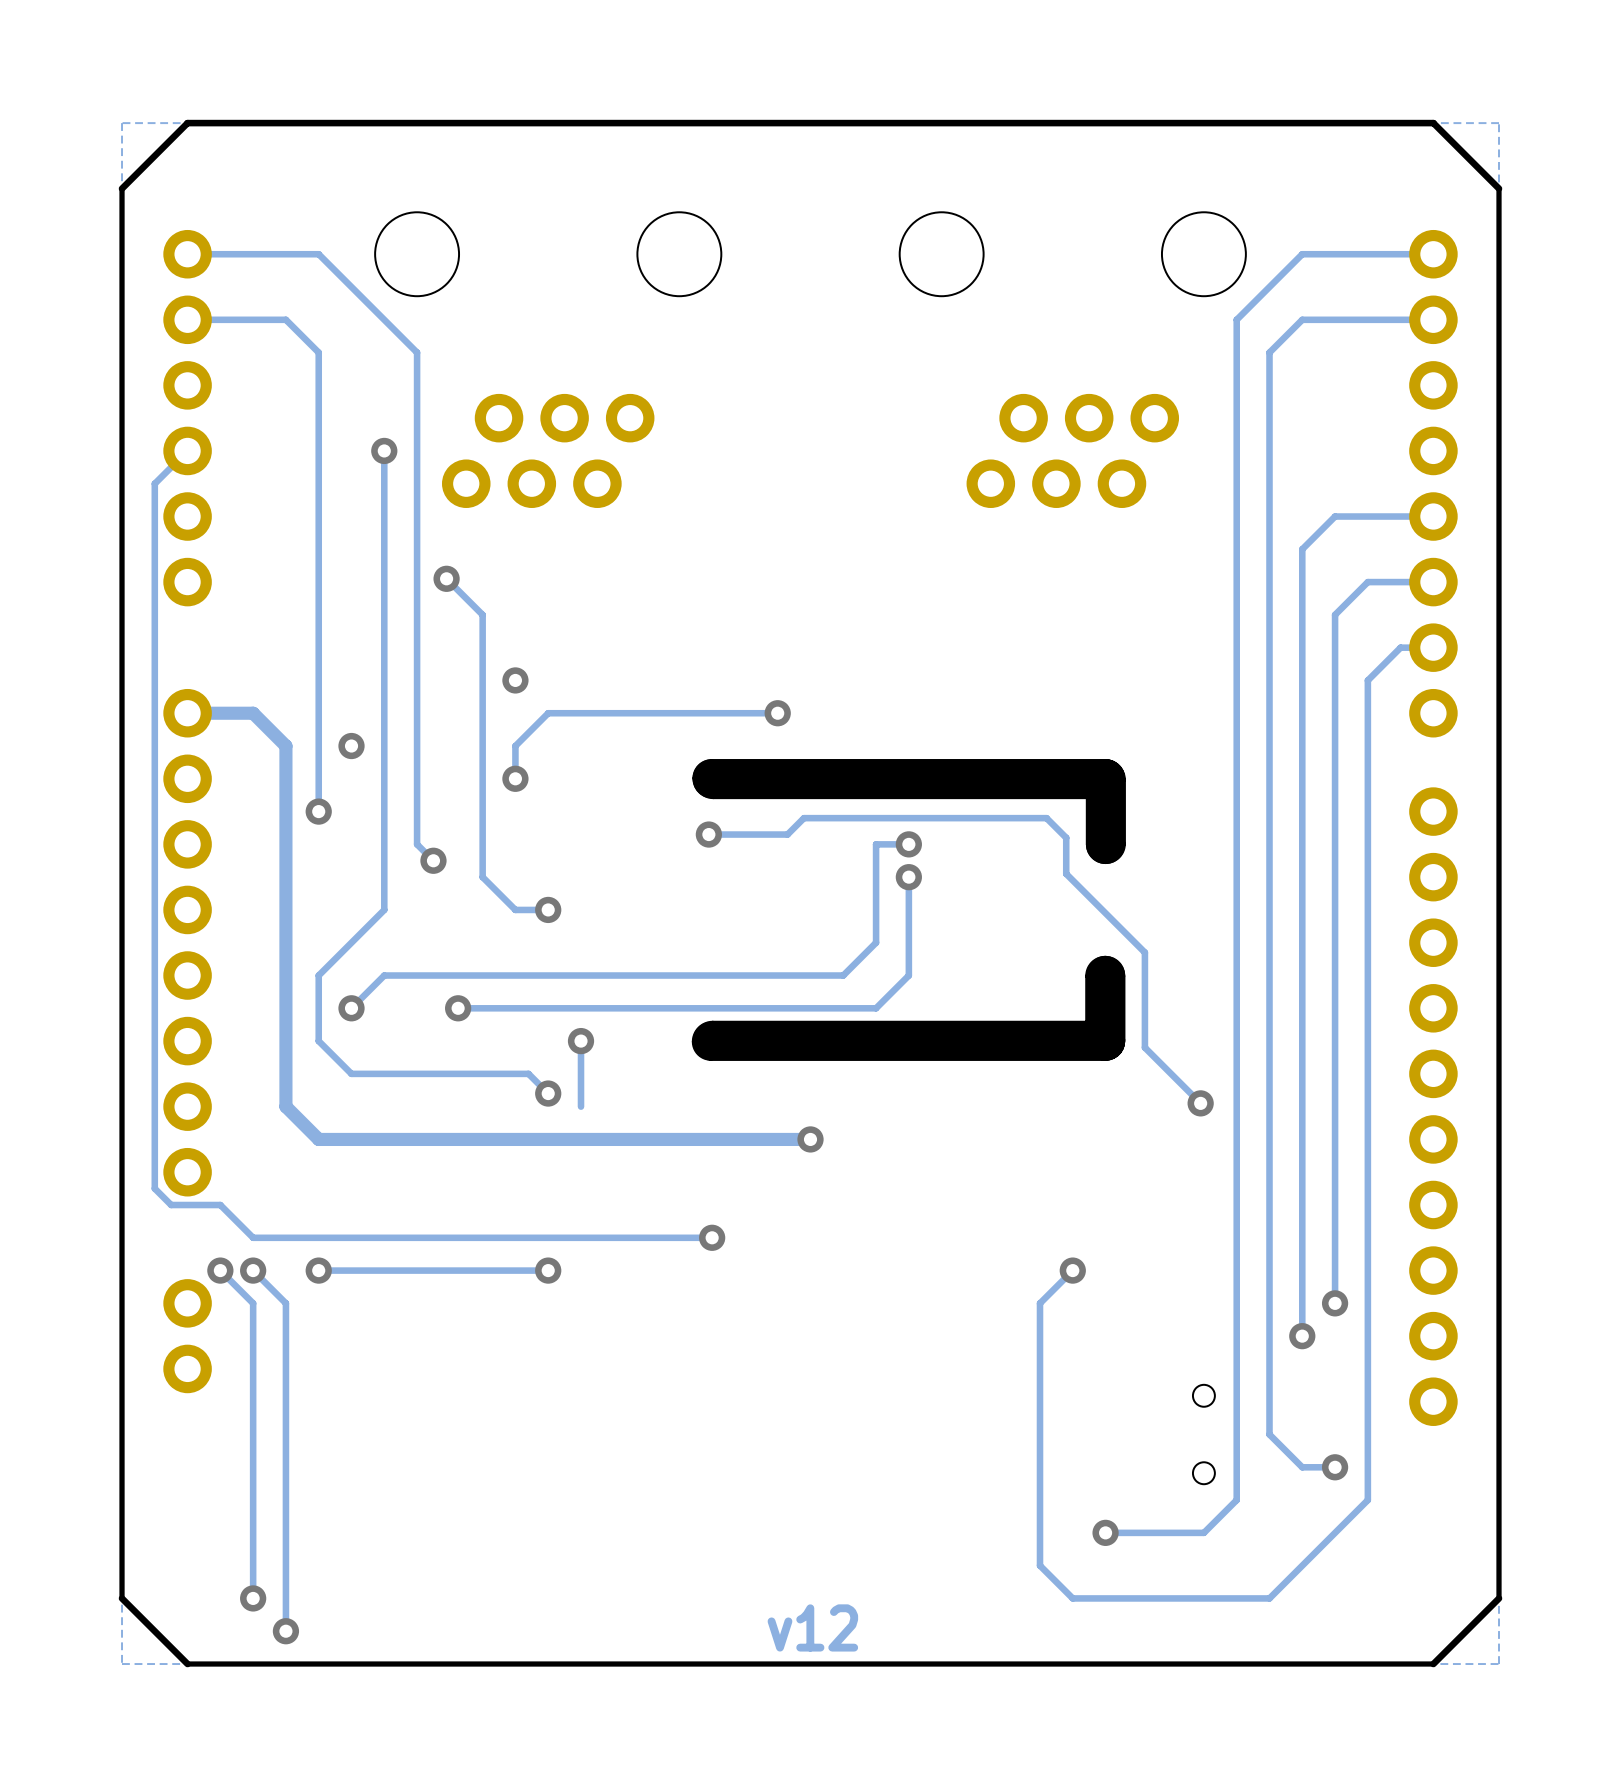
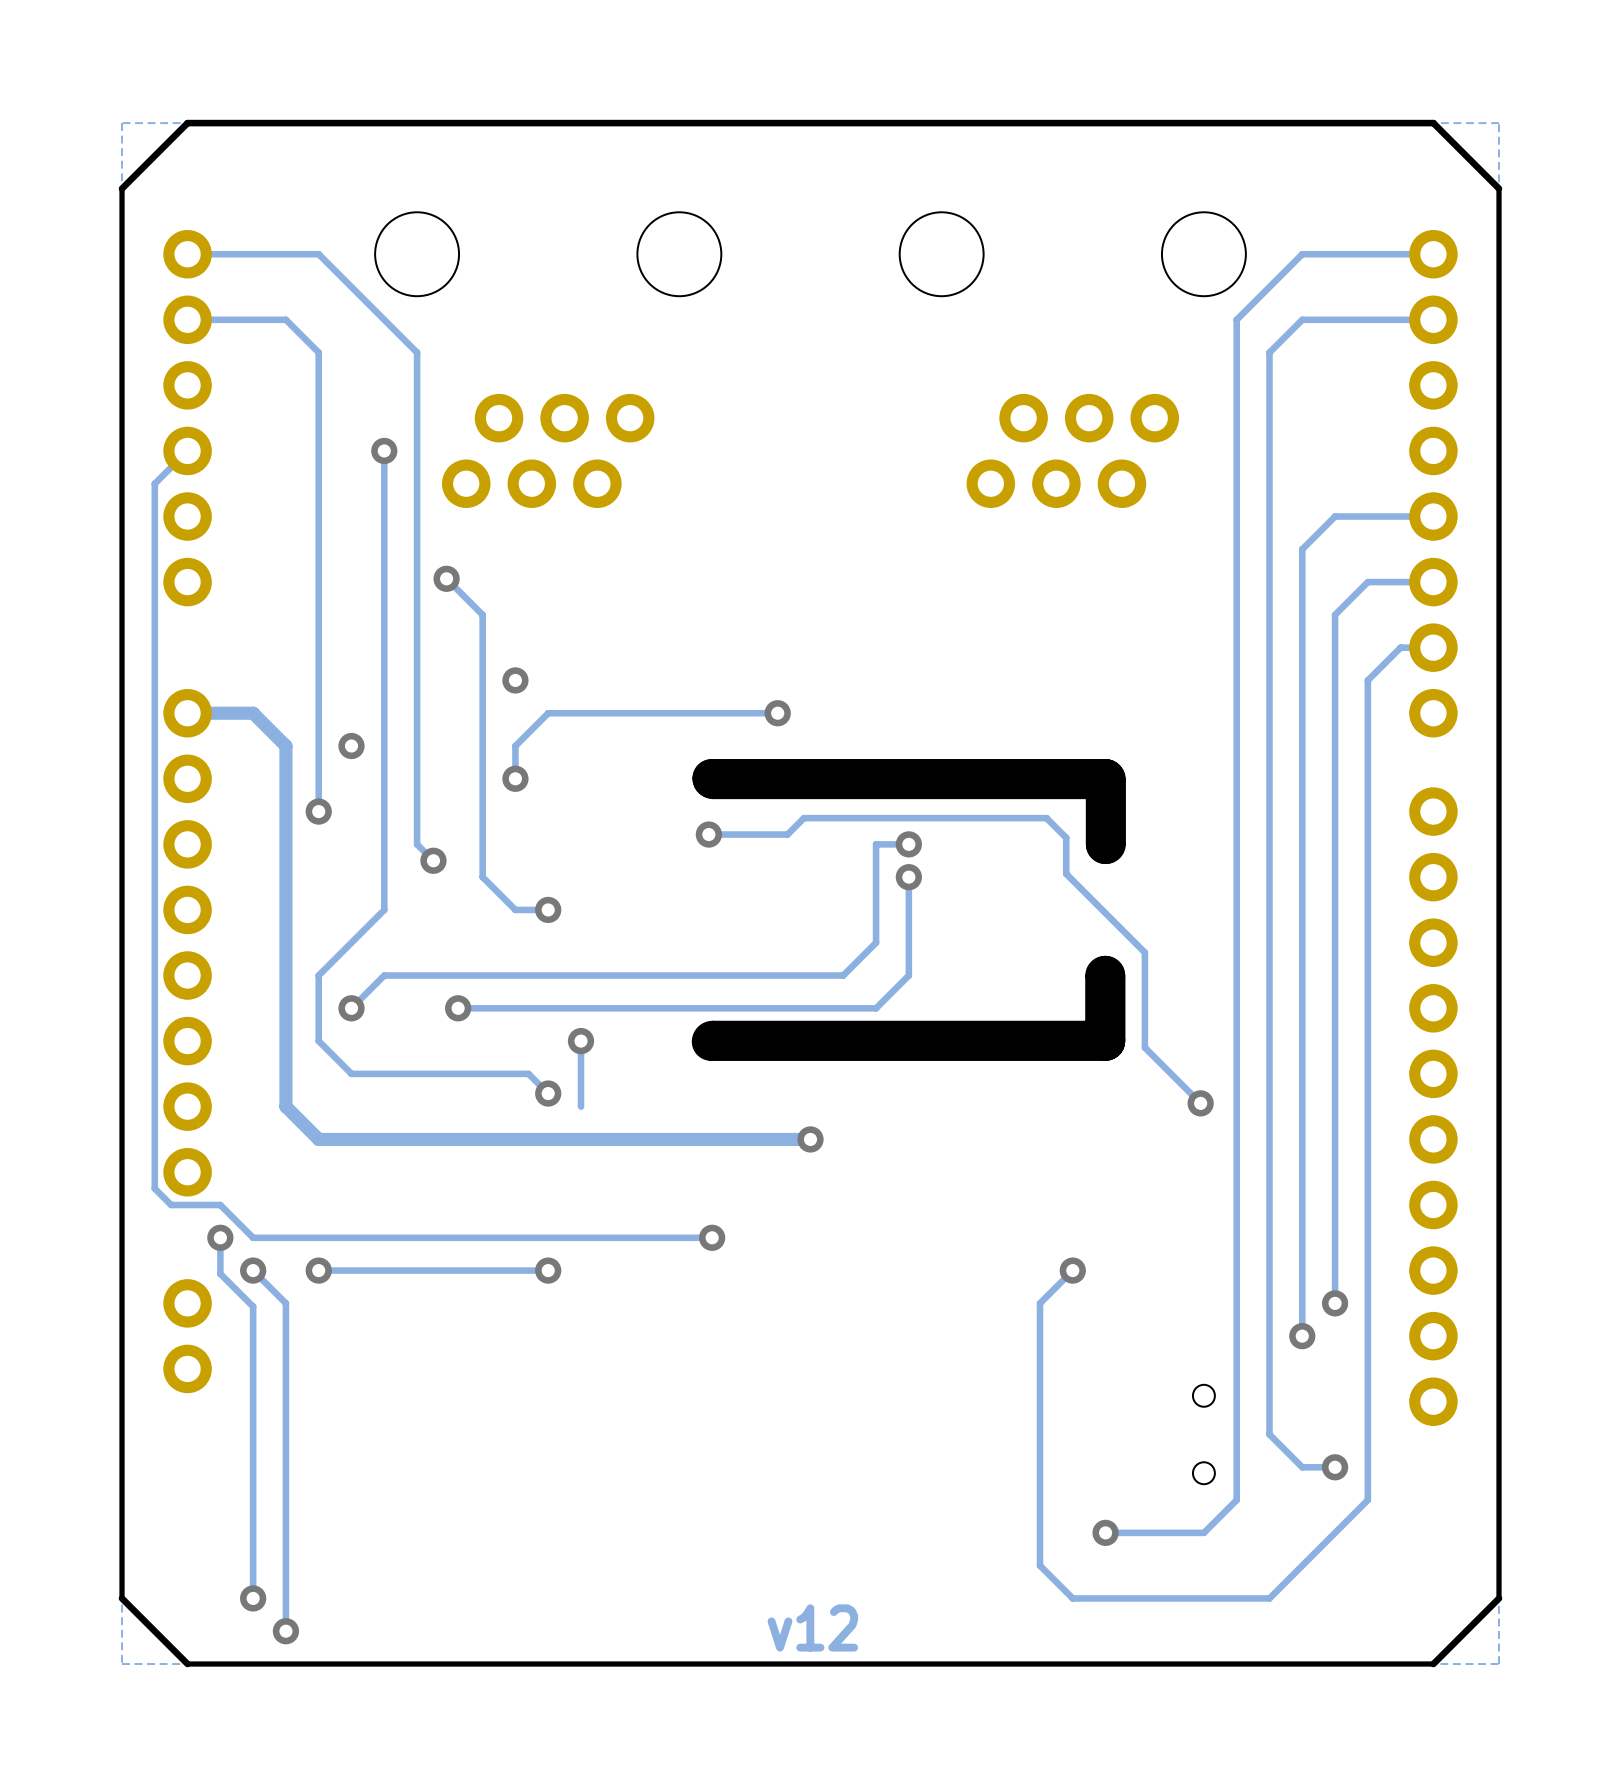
track: (220, 1270) (253, 1303) (253, 1306) -> (220, 1237) (220, 1273) (253, 1306)
via position: (220, 1270) -> (220, 1237)

